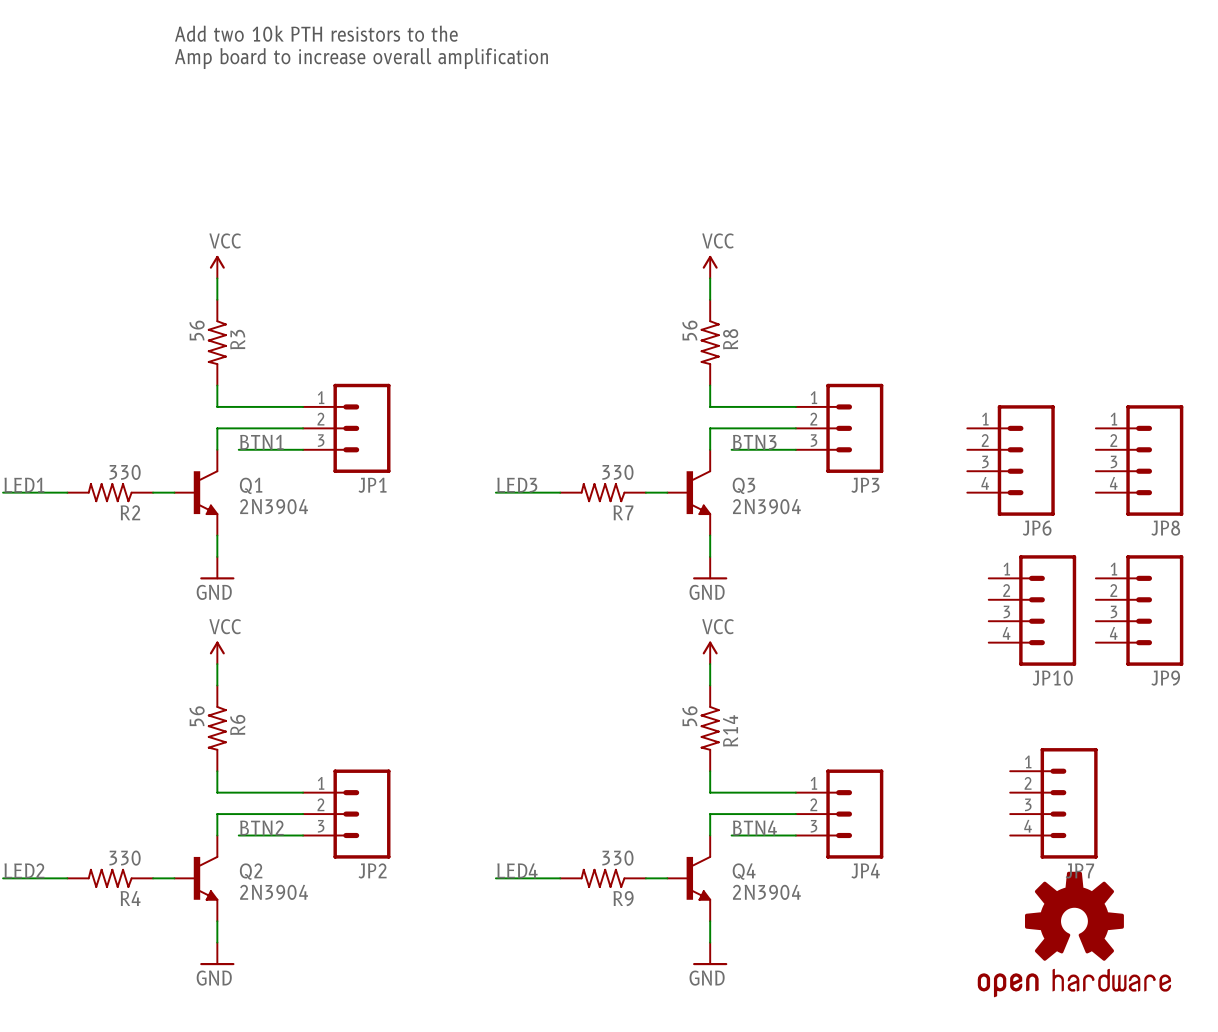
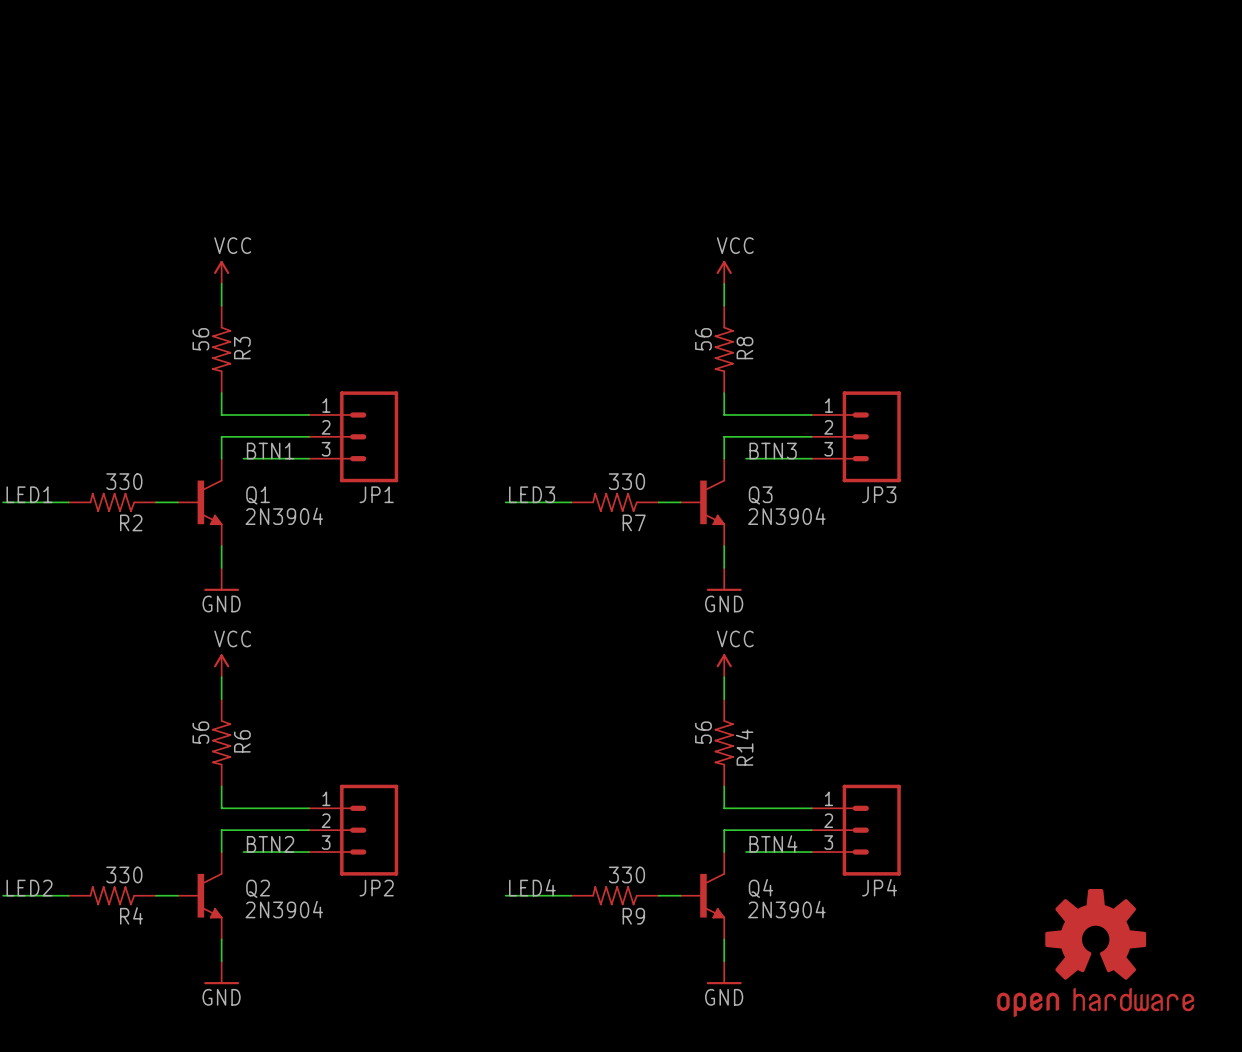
text: Add two 10k PTH resistors to the (316, 33) -> none
text: Amp board to increase overall amplification (361, 58) -> none
JP6: (1011, 460) -> none
JP8: (1139, 460) -> none
JP10: (1032, 610) -> none
JP9: (1139, 610) -> none
JP7: (1053, 803) -> none

